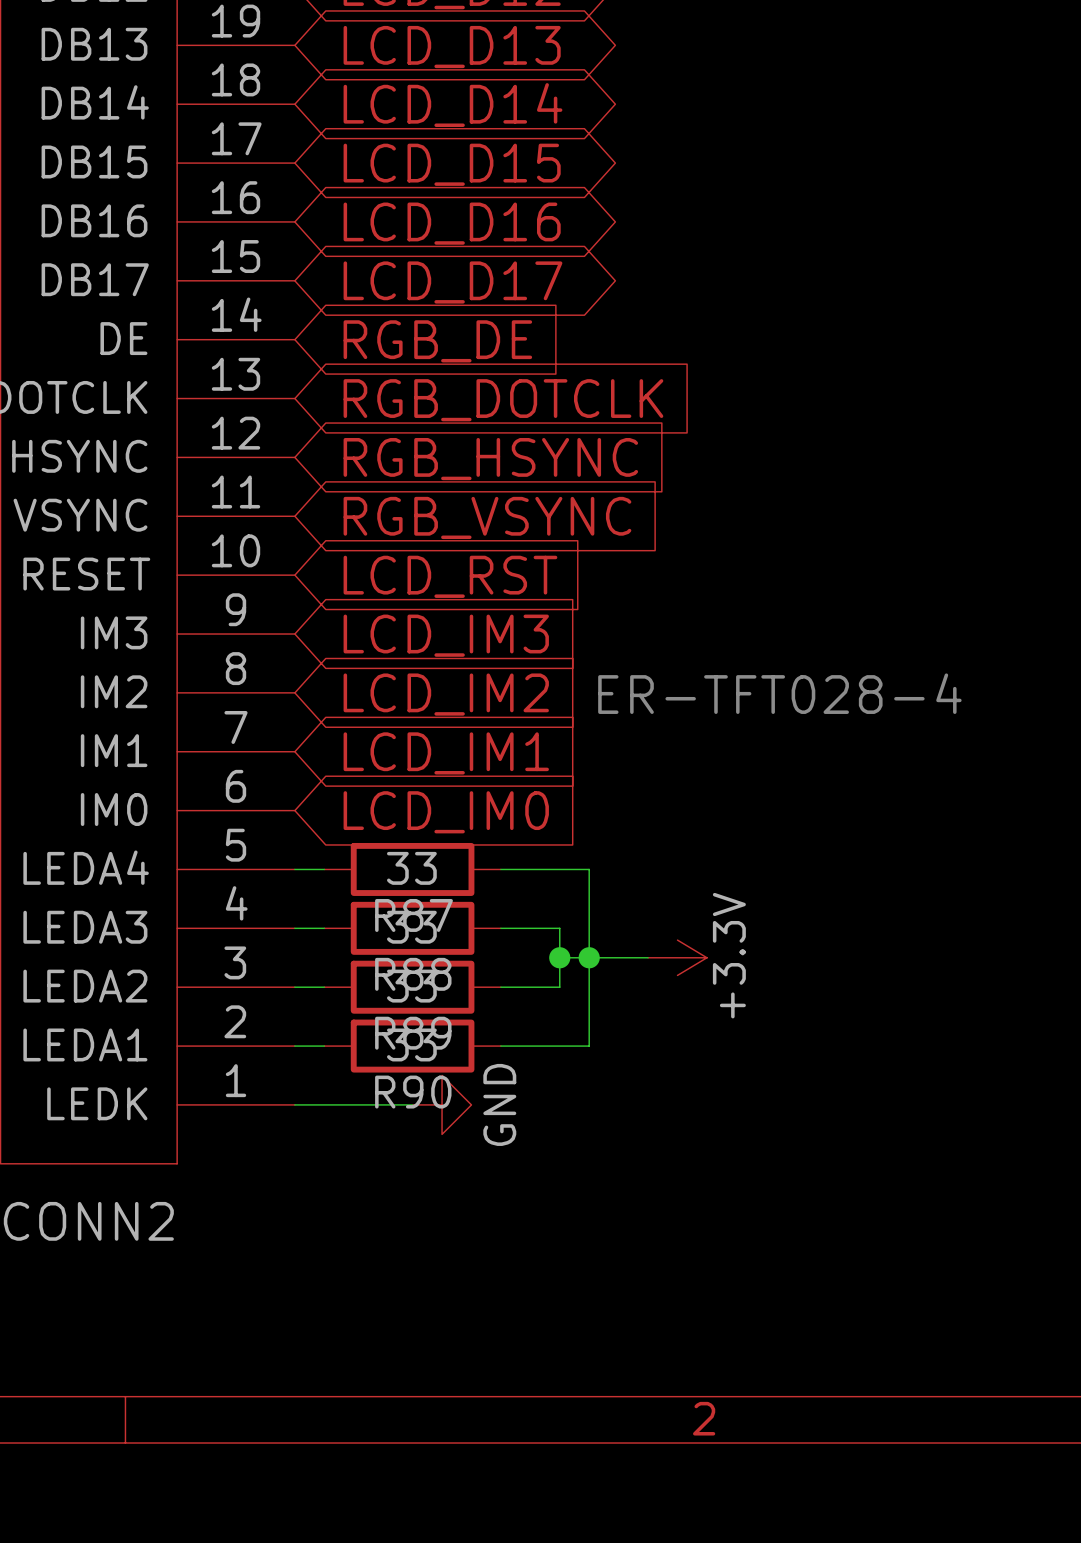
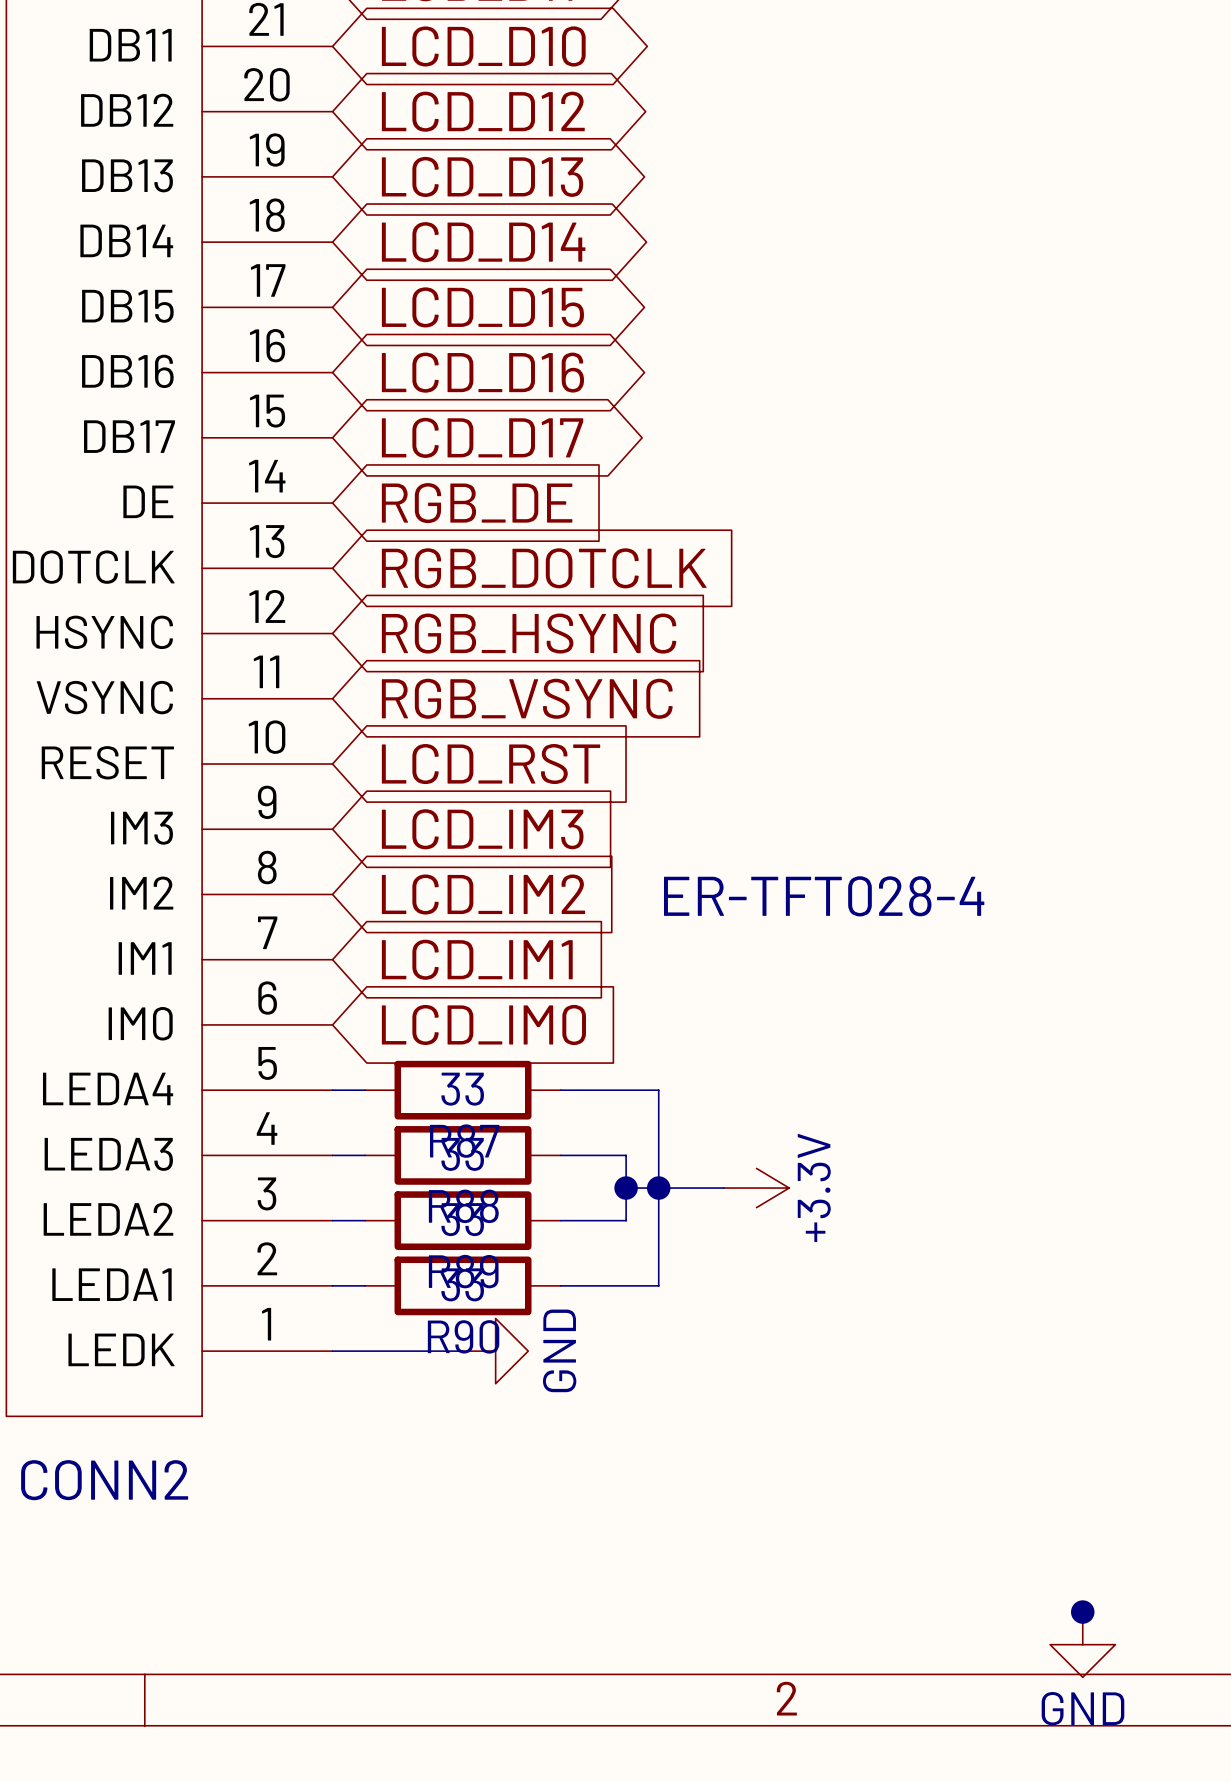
junction: none -> (1082, 1612)
power symbol: none -> GND (1082, 1644)

